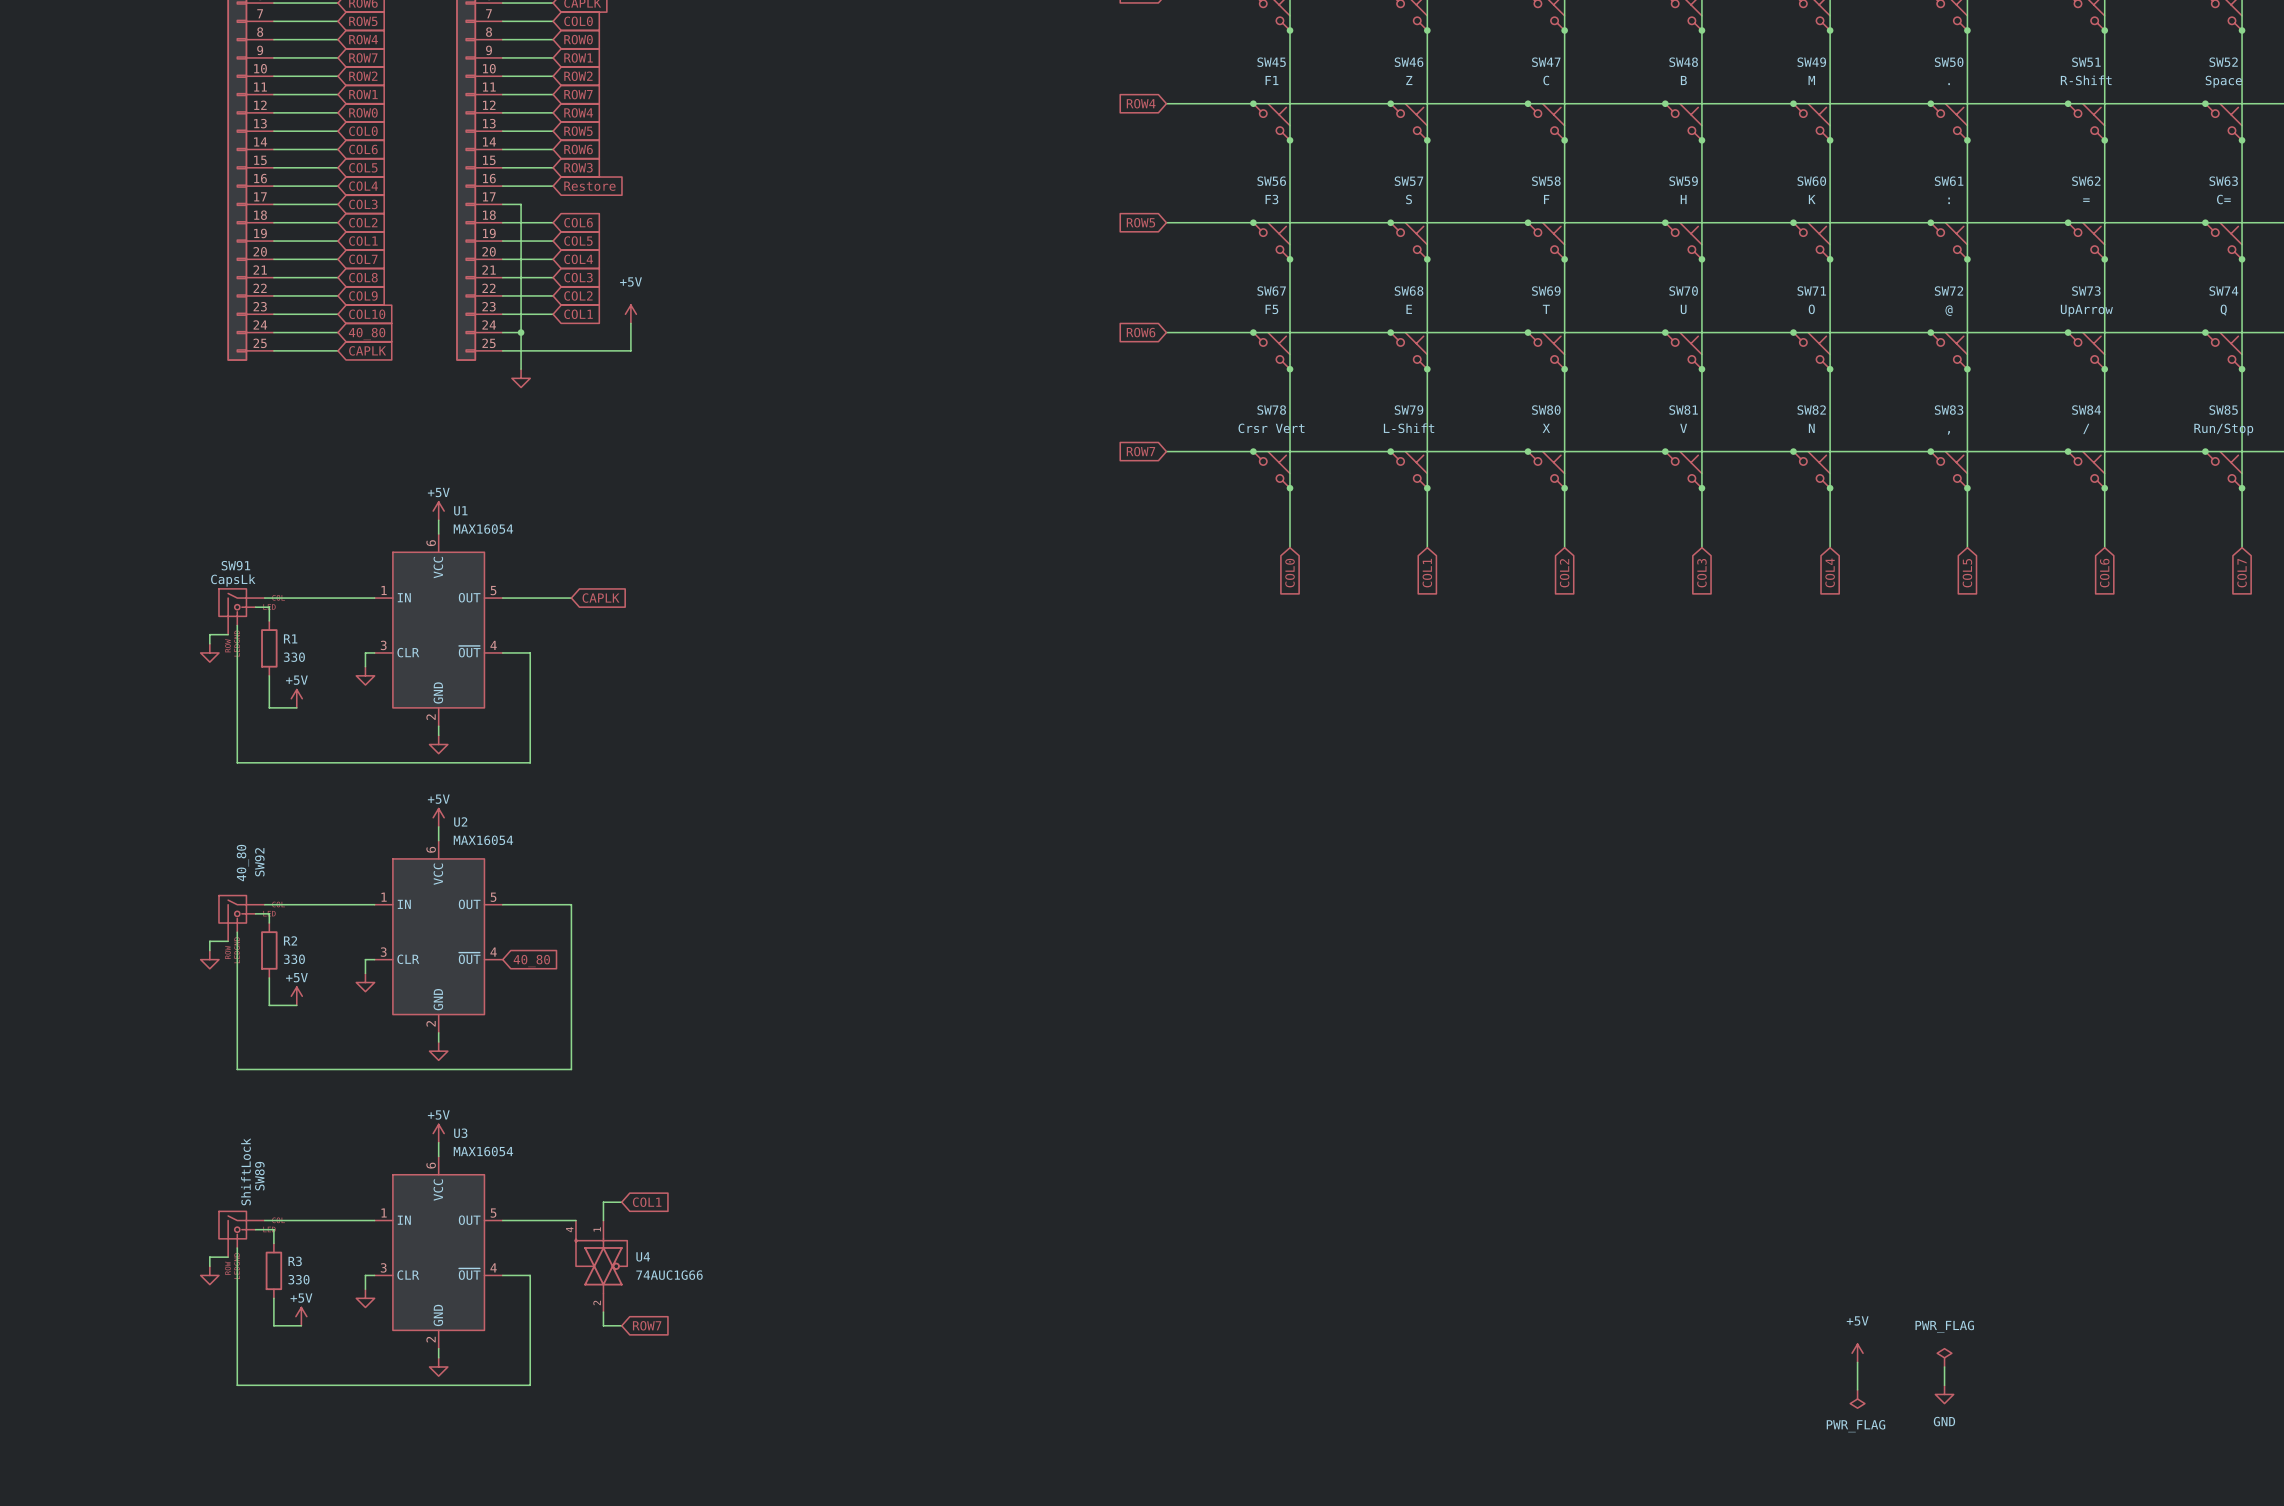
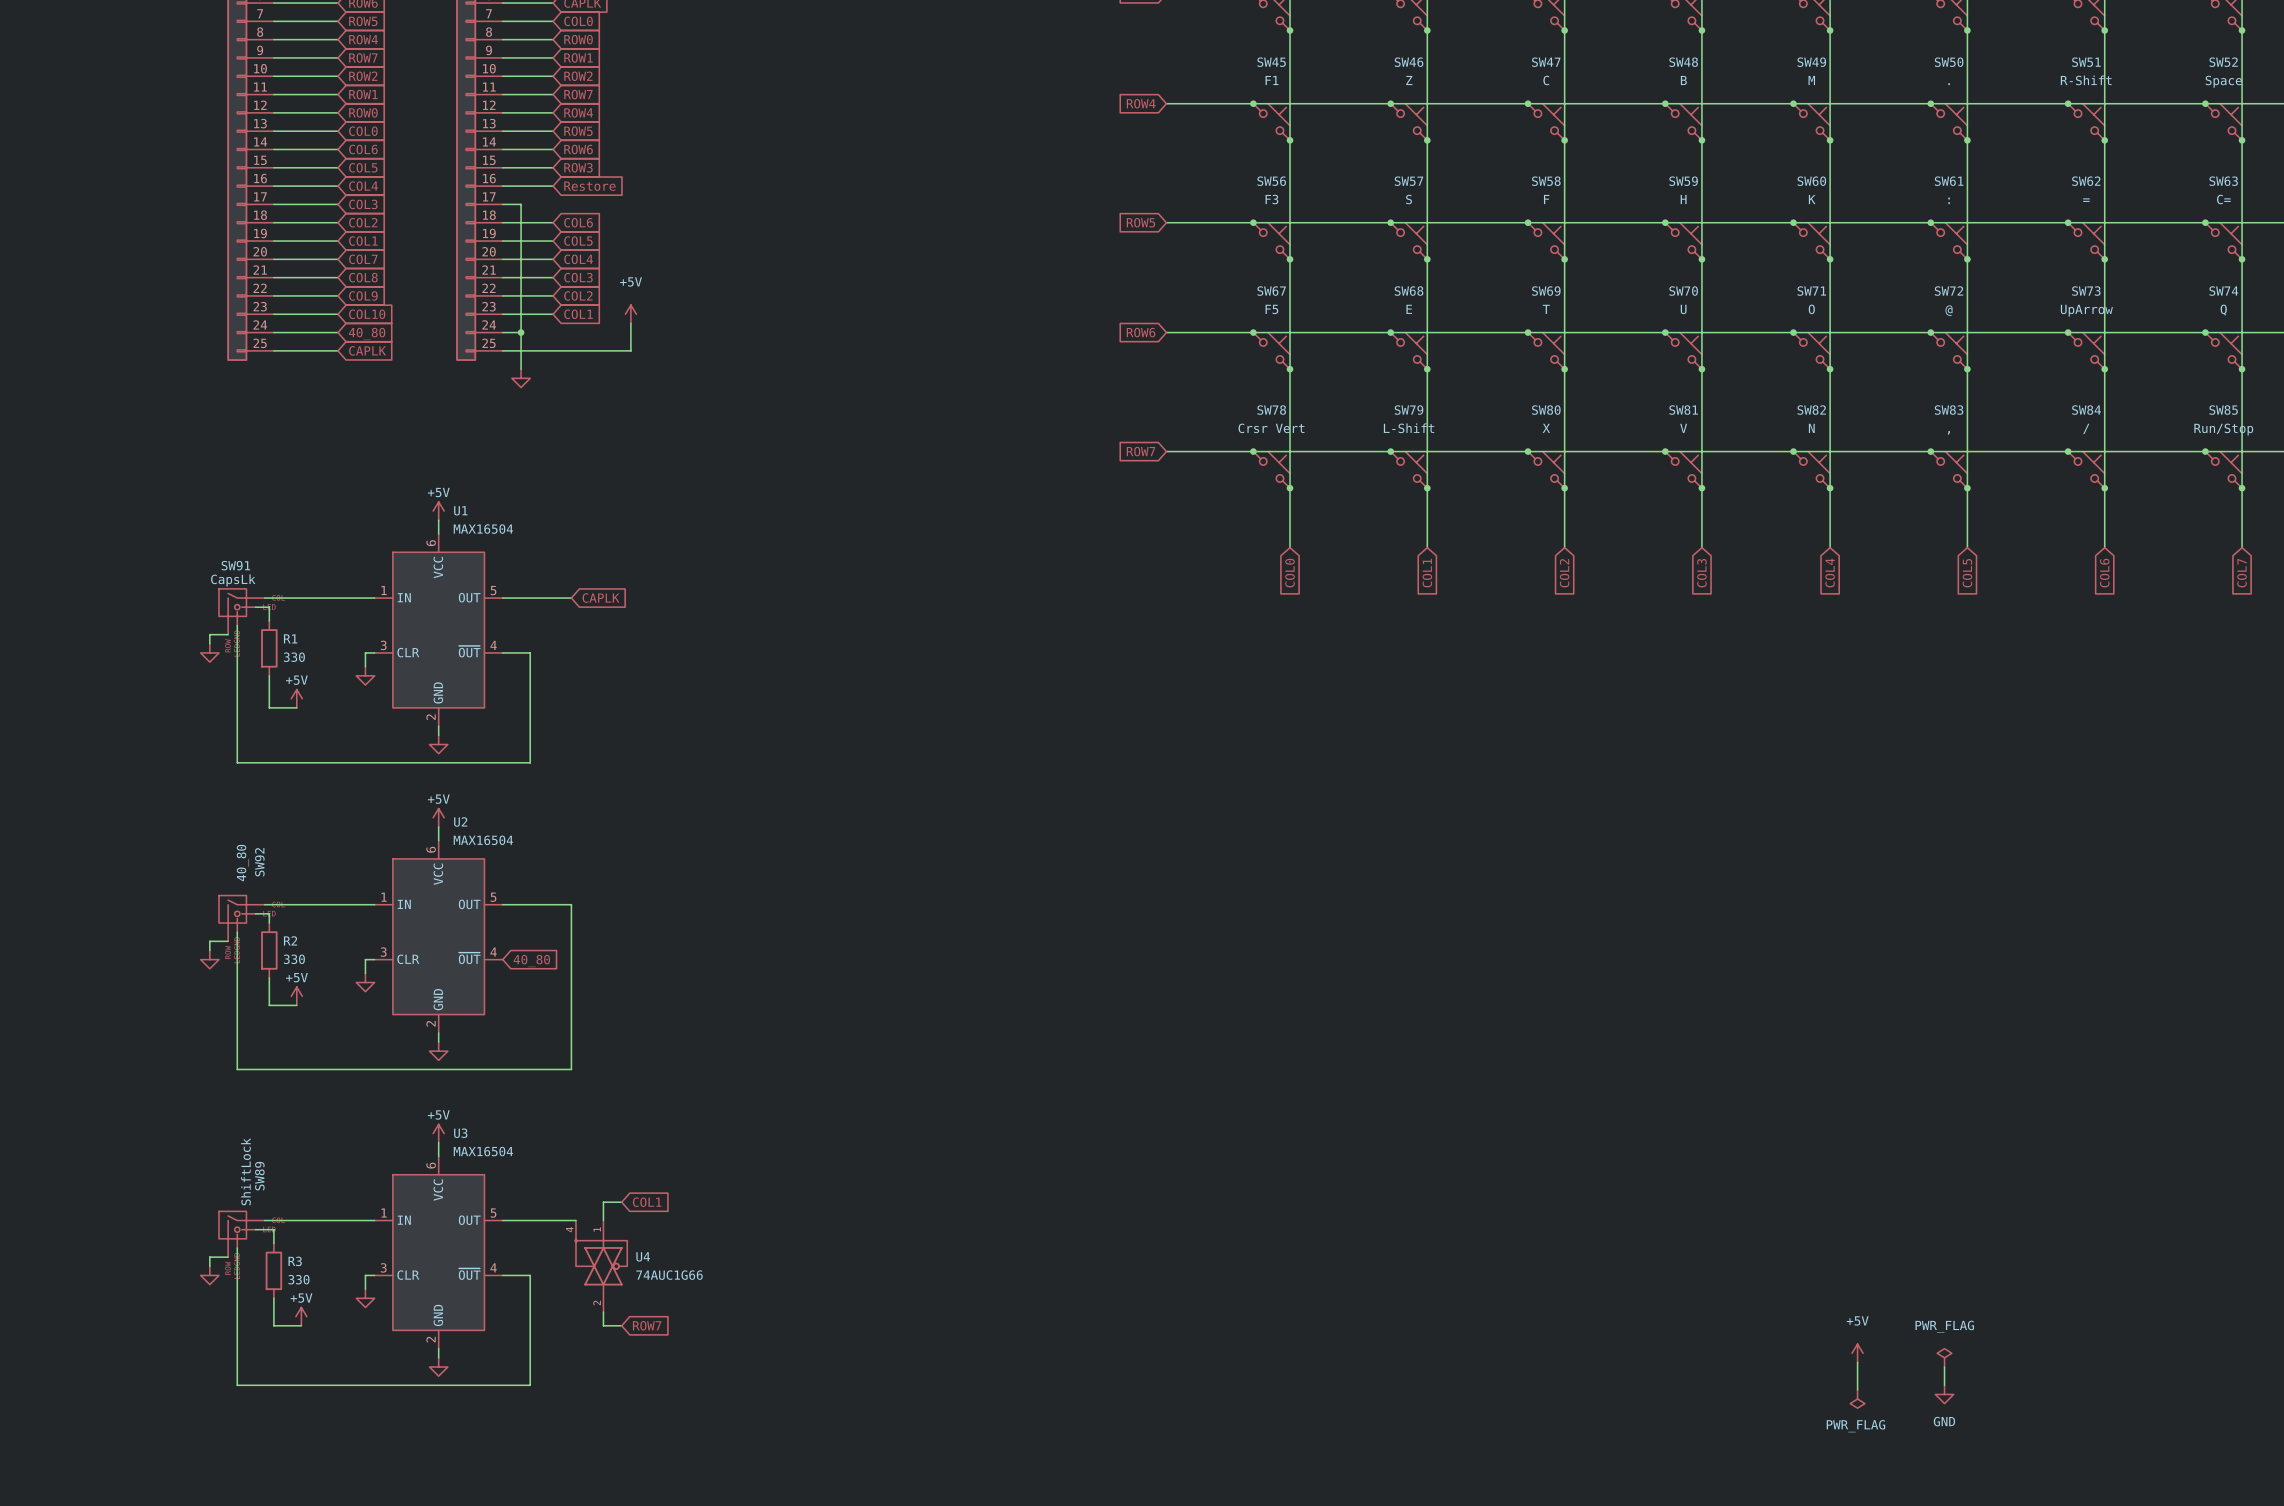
U1 value: MAX16054 (483, 529) -> MAX16504 (483, 529)
U2 value: MAX16054 (483, 840) -> MAX16504 (483, 840)
U3 value: MAX16054 (483, 1151) -> MAX16504 (483, 1151)

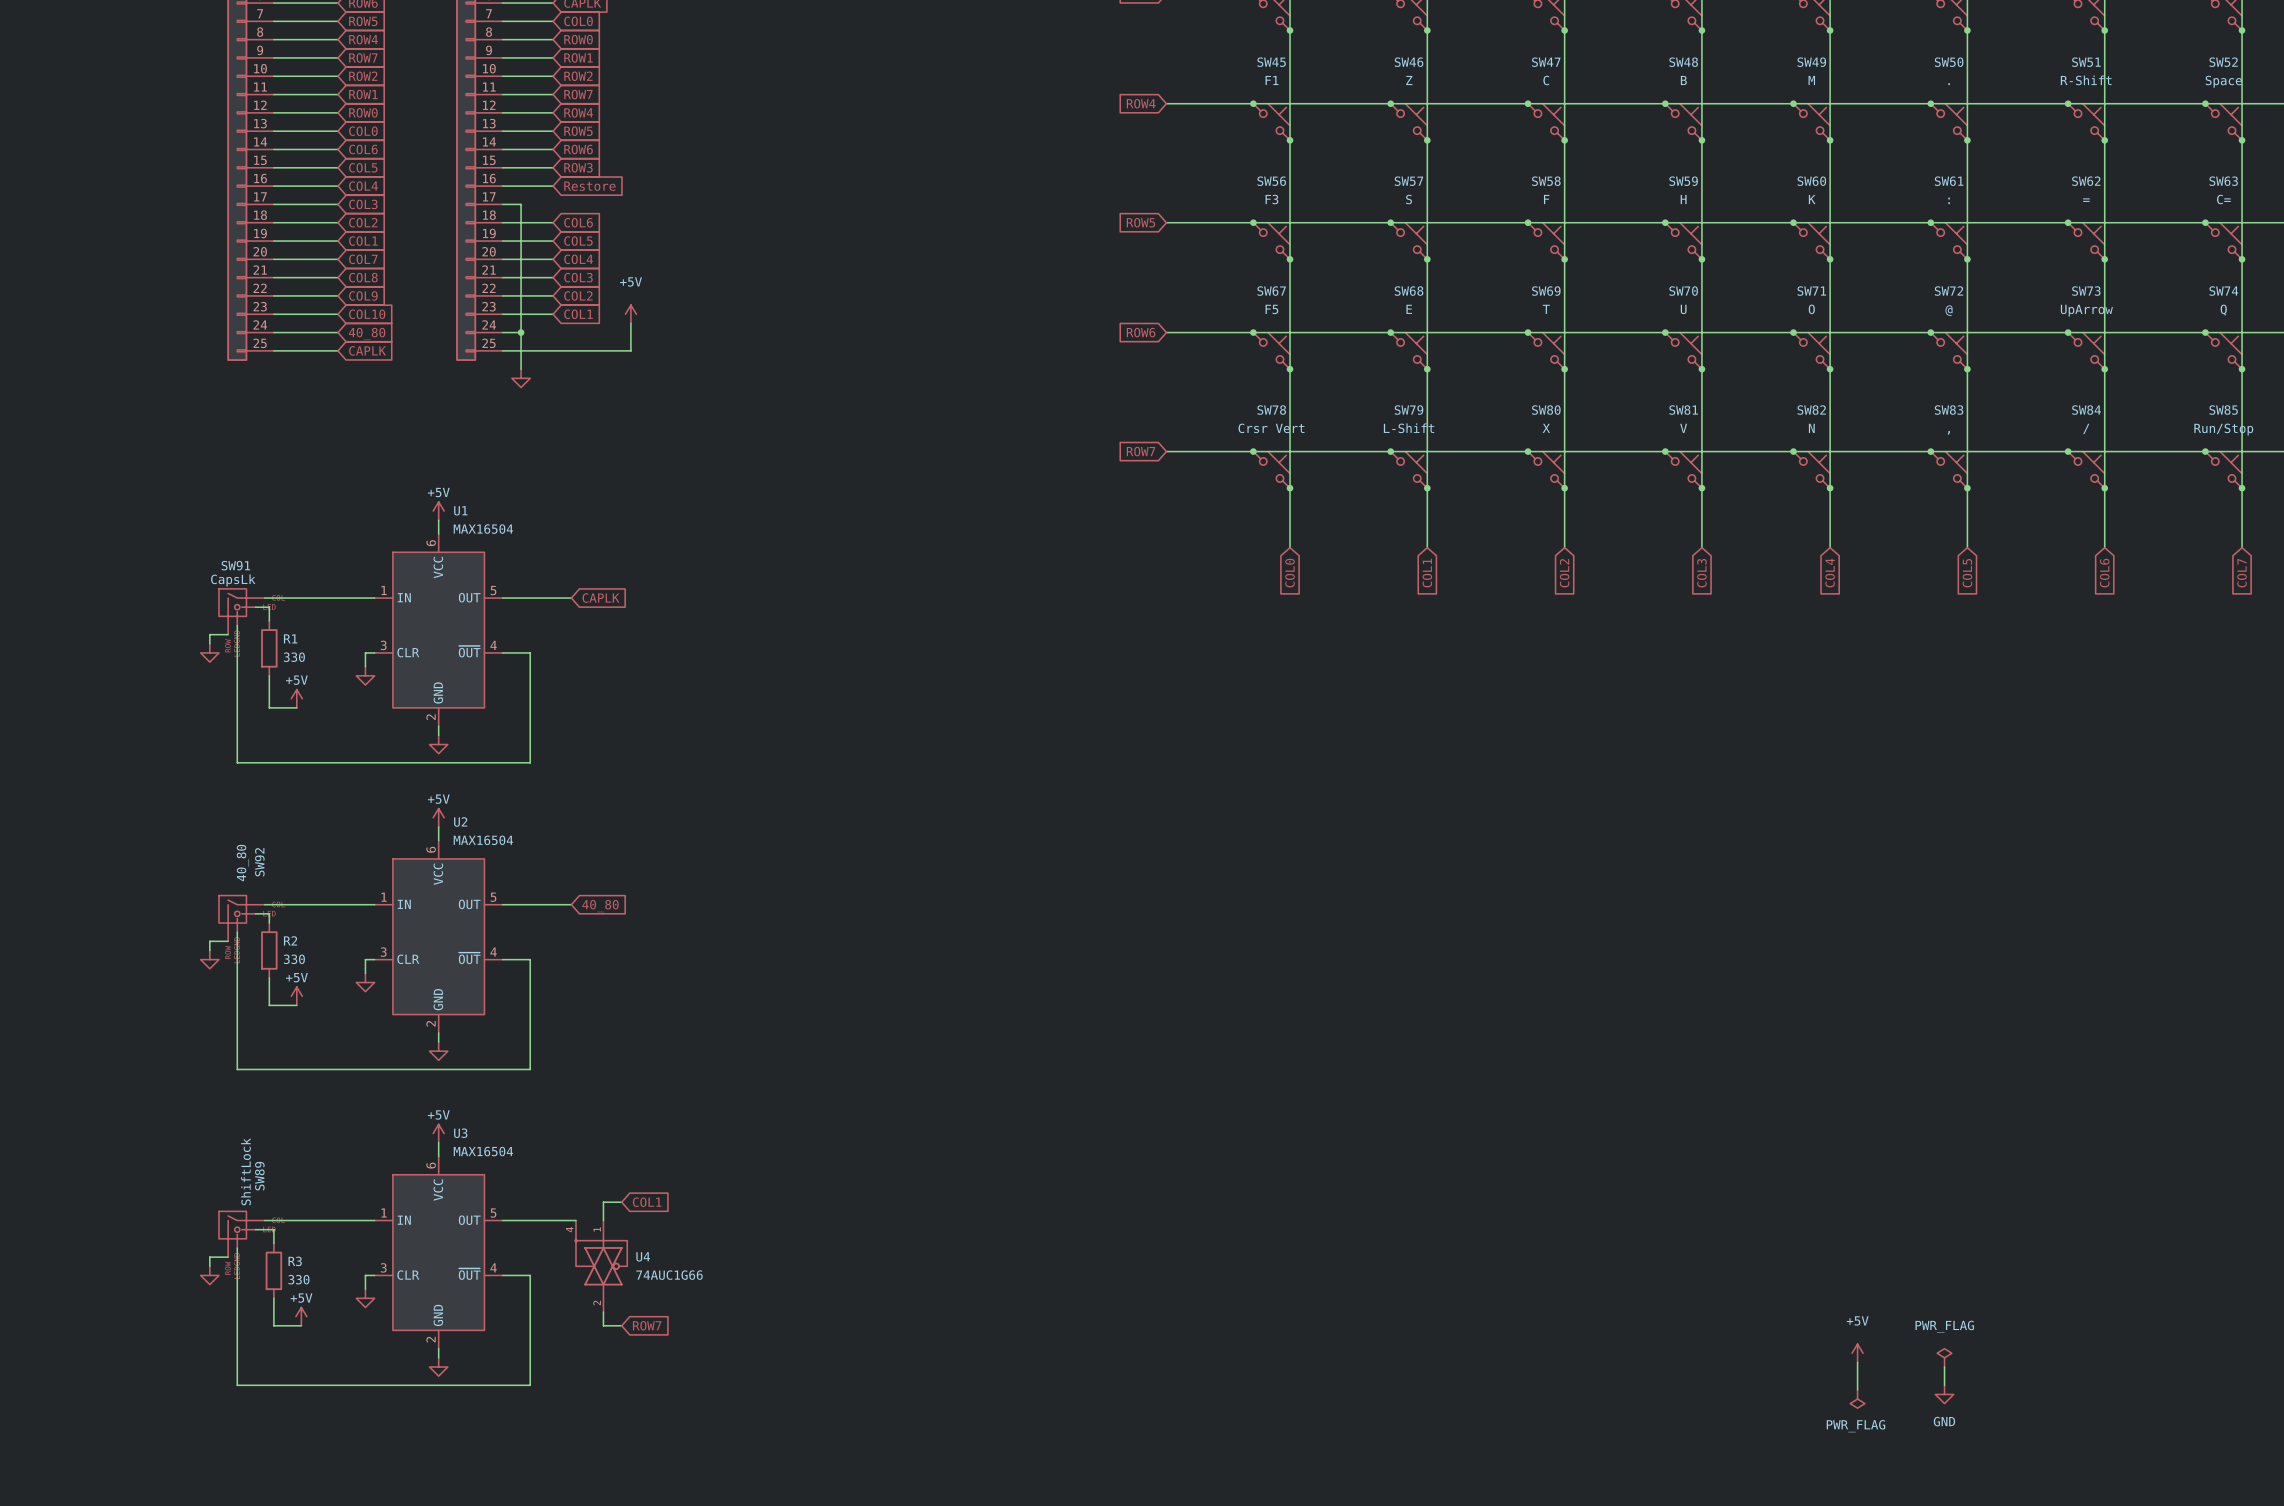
wire: (571, 904) (571, 1069) (530, 1069) -> (502, 959) (530, 959) (530, 1069)
global label position: 40_80 (531, 961) -> 40_80 (600, 906)

